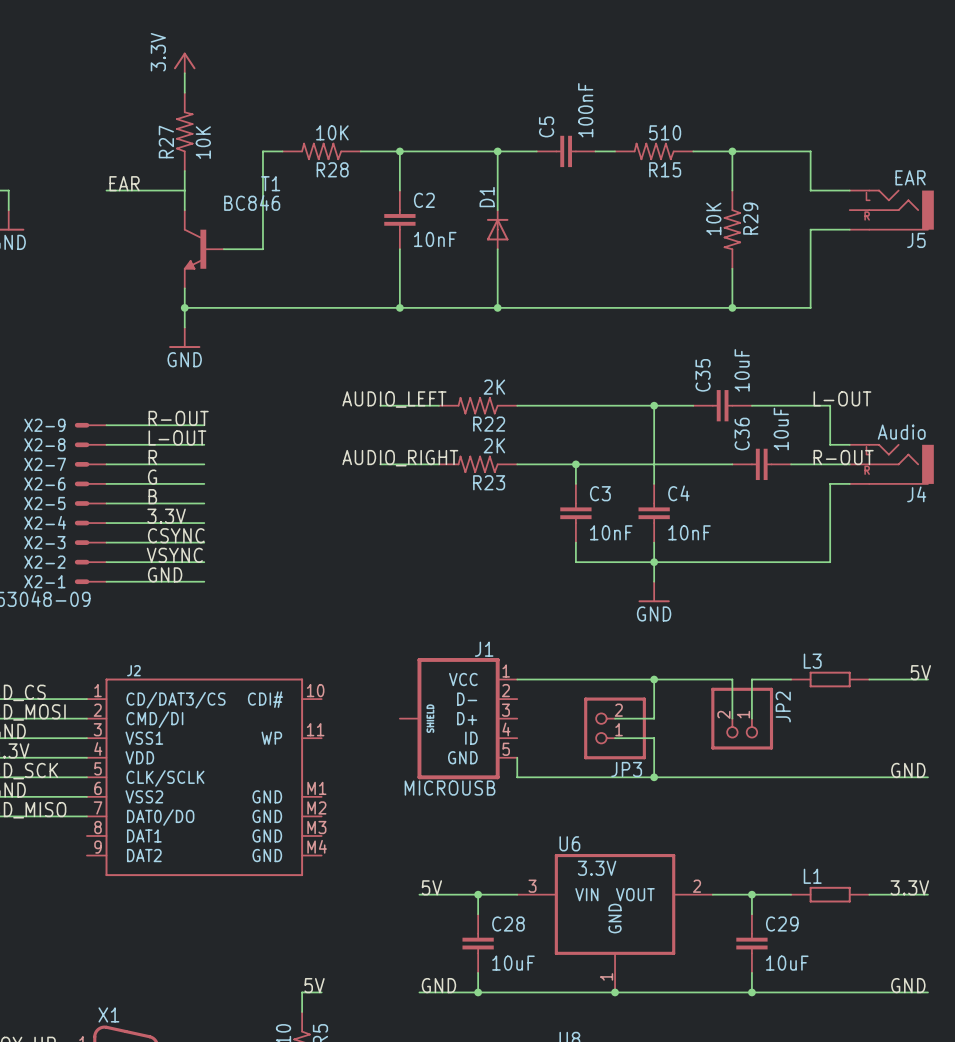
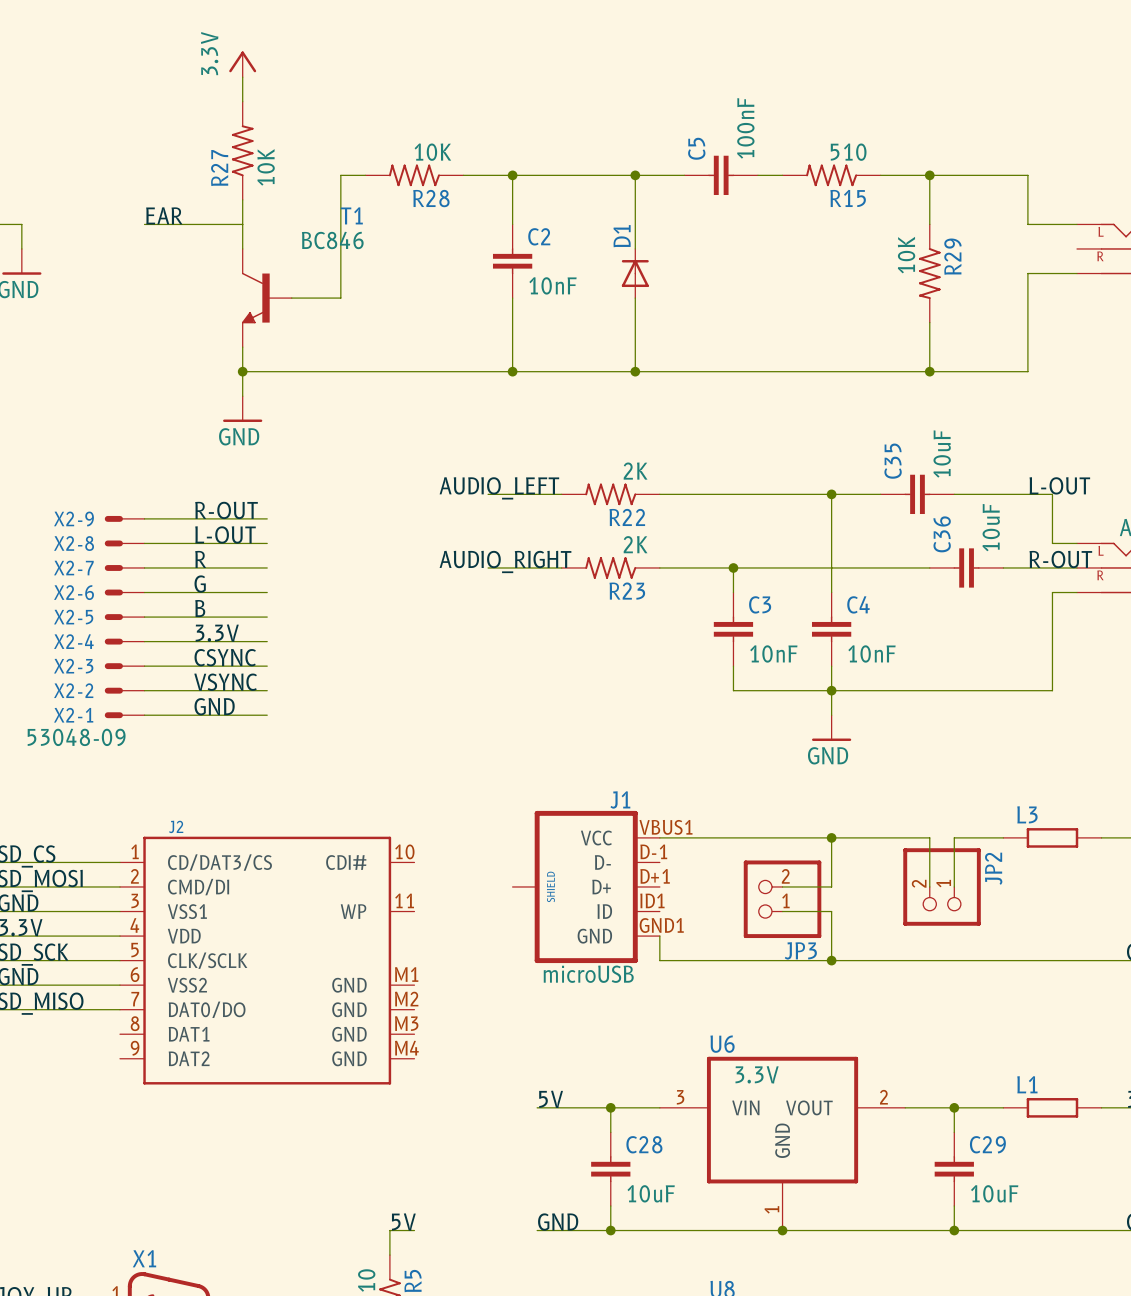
J1 pin number: 1 (506, 671) -> VBUS1 (665, 827)
J1 pin number: 2 (505, 690) -> D-1 (653, 851)
J1 pin number: 3 (505, 710) -> D+1 (655, 876)
J1 pin number: 4 (506, 729) -> ID1 (652, 900)
J1 pin number: 5 (506, 749) -> GND1 (661, 925)
J1 value: MICROUSB (450, 788) -> microUSB (588, 974)

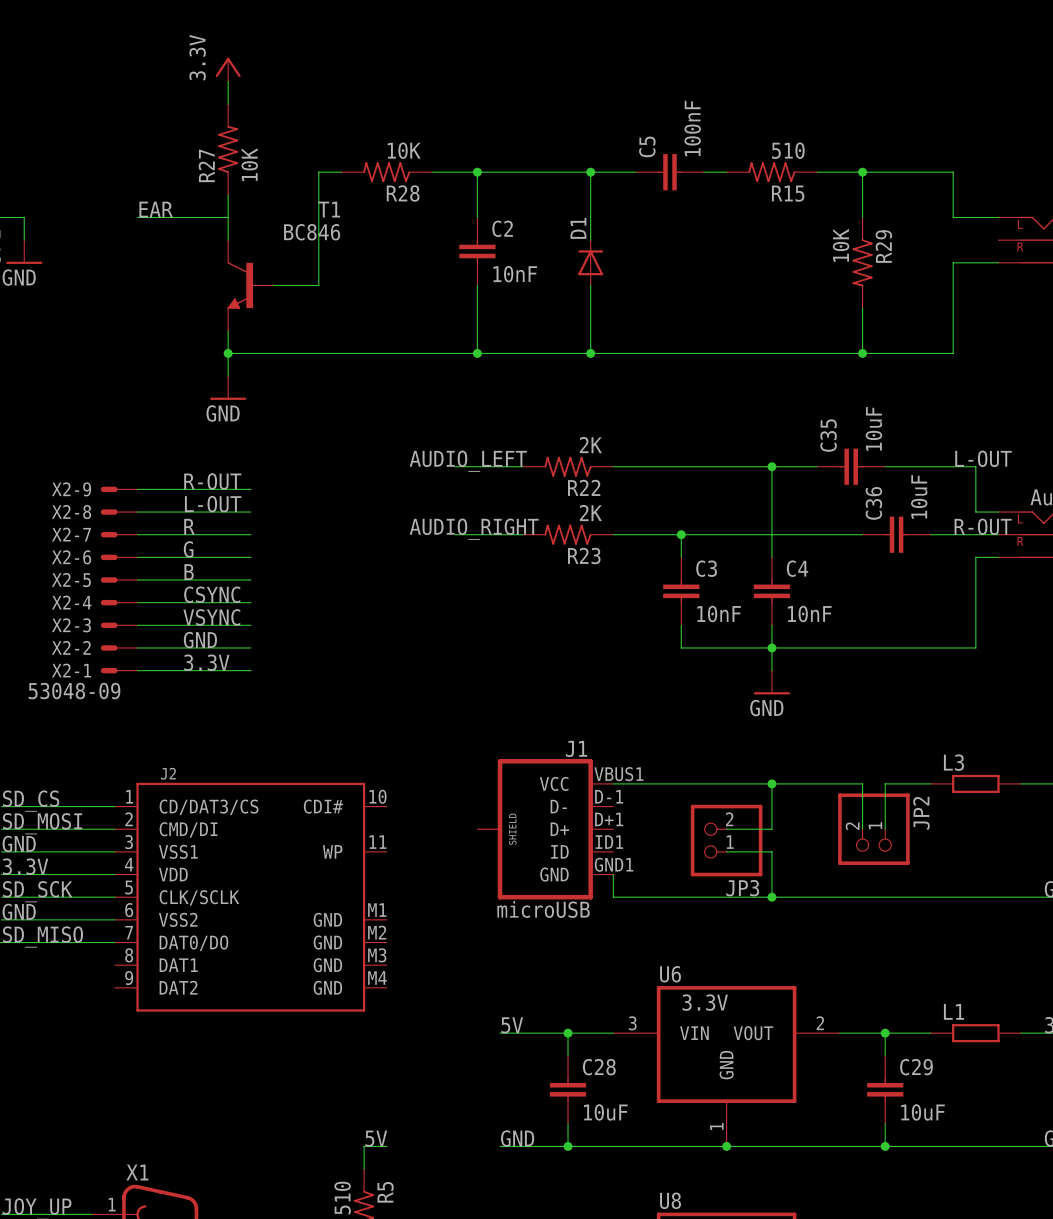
label: 3.3V (217, 633) -> CSYNC (212, 594)
label: CSYNC (225, 657) -> VSYNC (211, 617)
label: VSYNC (225, 682) -> GND (200, 640)
label: GND (214, 706) -> 3.3V (206, 662)

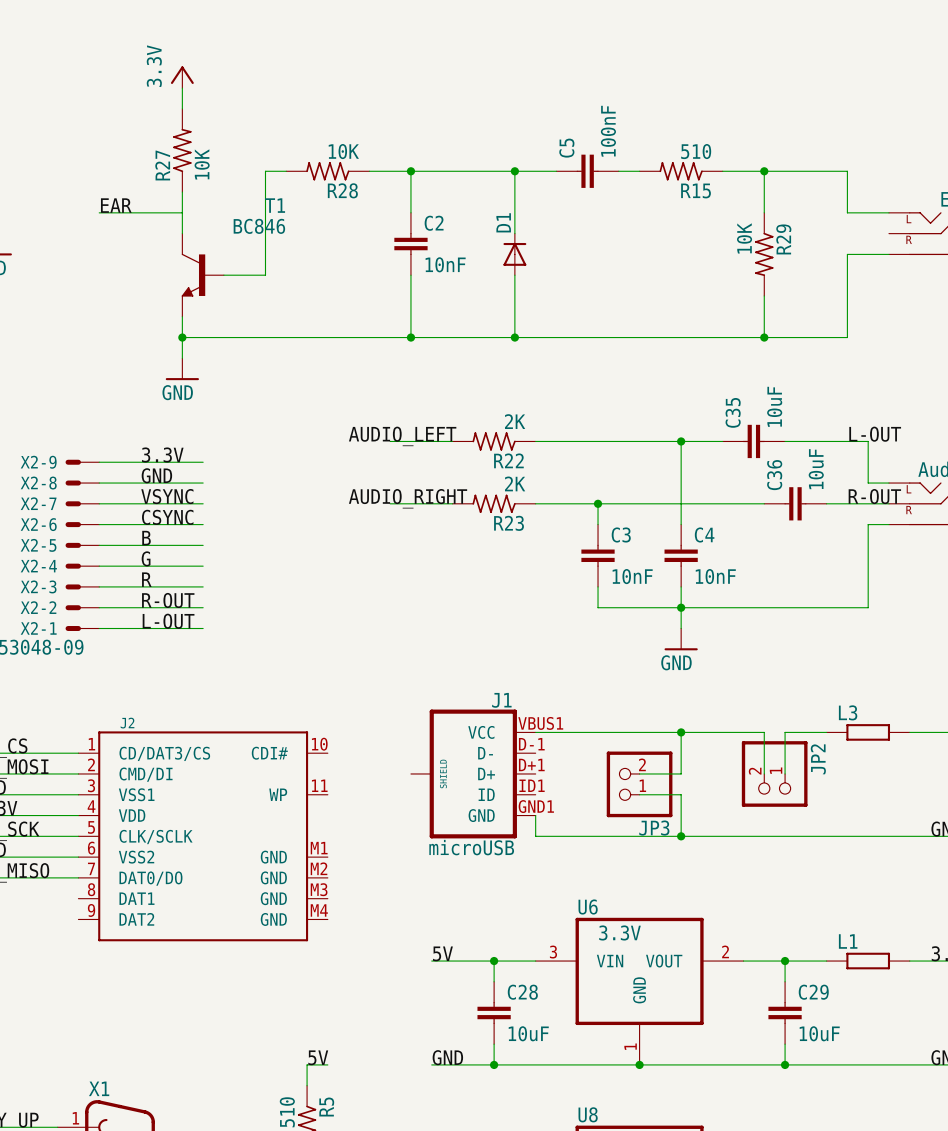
label: R-OUT (212, 481) -> 3.3V (162, 454)
label: L-OUT (213, 504) -> GND (156, 475)
label: R (189, 526) -> VSYNC (167, 496)
label: G (188, 549) -> CSYNC (167, 517)
label: CSYNC (212, 594) -> G (146, 558)
label: VSYNC (211, 617) -> R (146, 579)
label: GND (200, 640) -> R-OUT (168, 600)
label: 3.3V (206, 662) -> L-OUT (168, 621)

